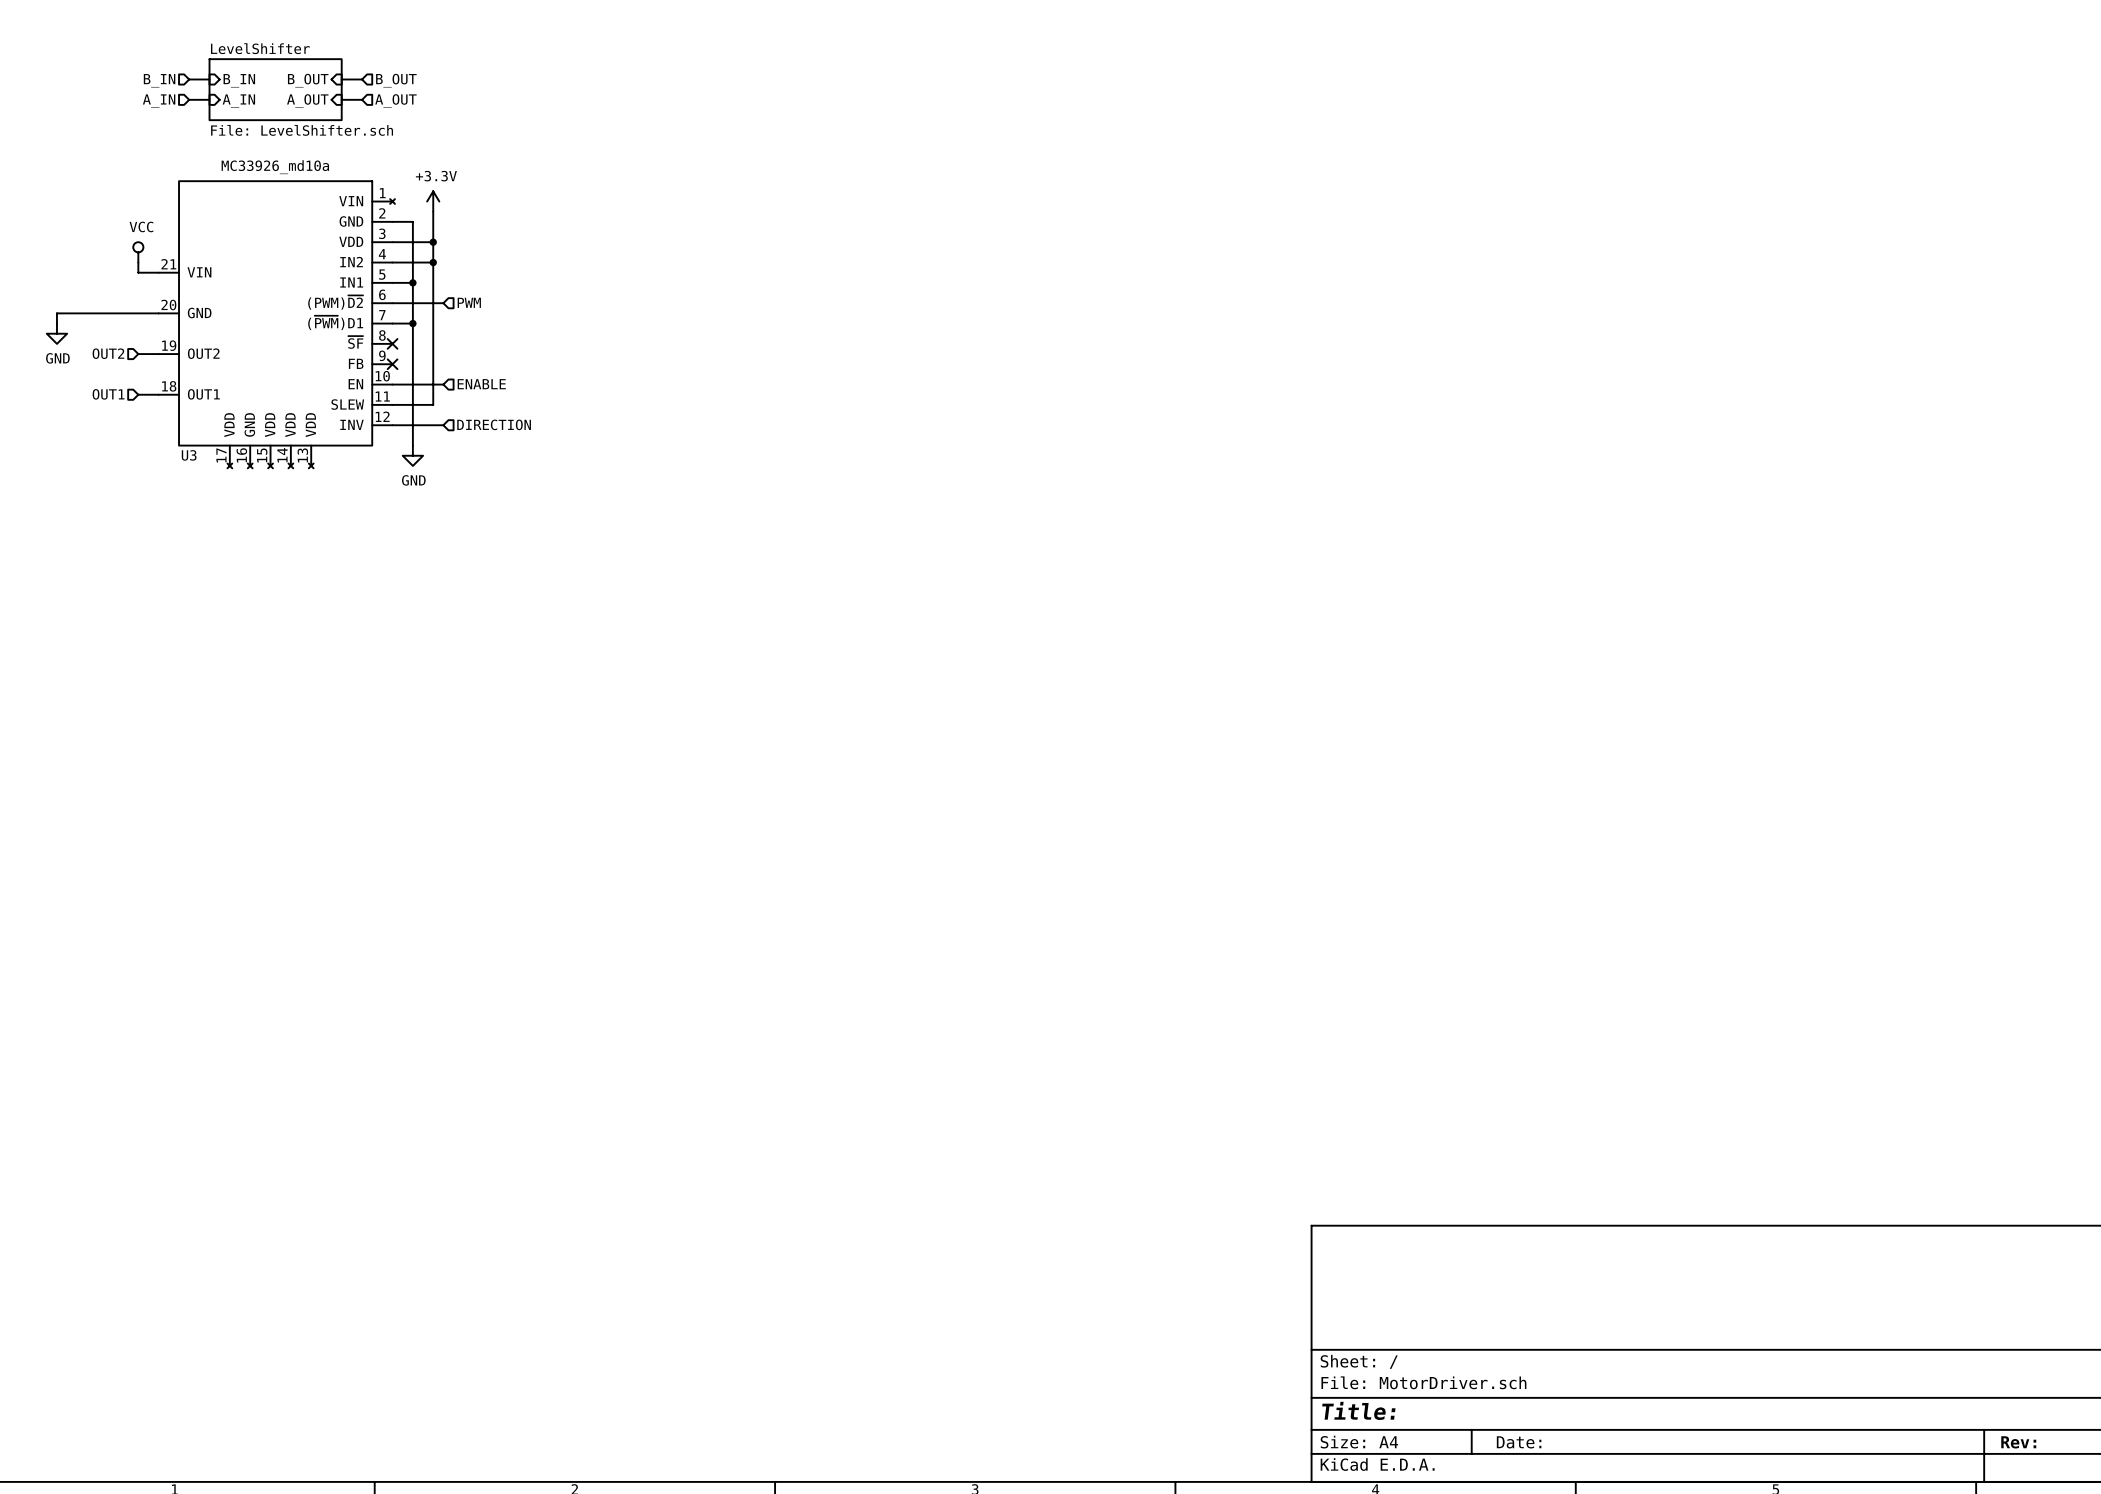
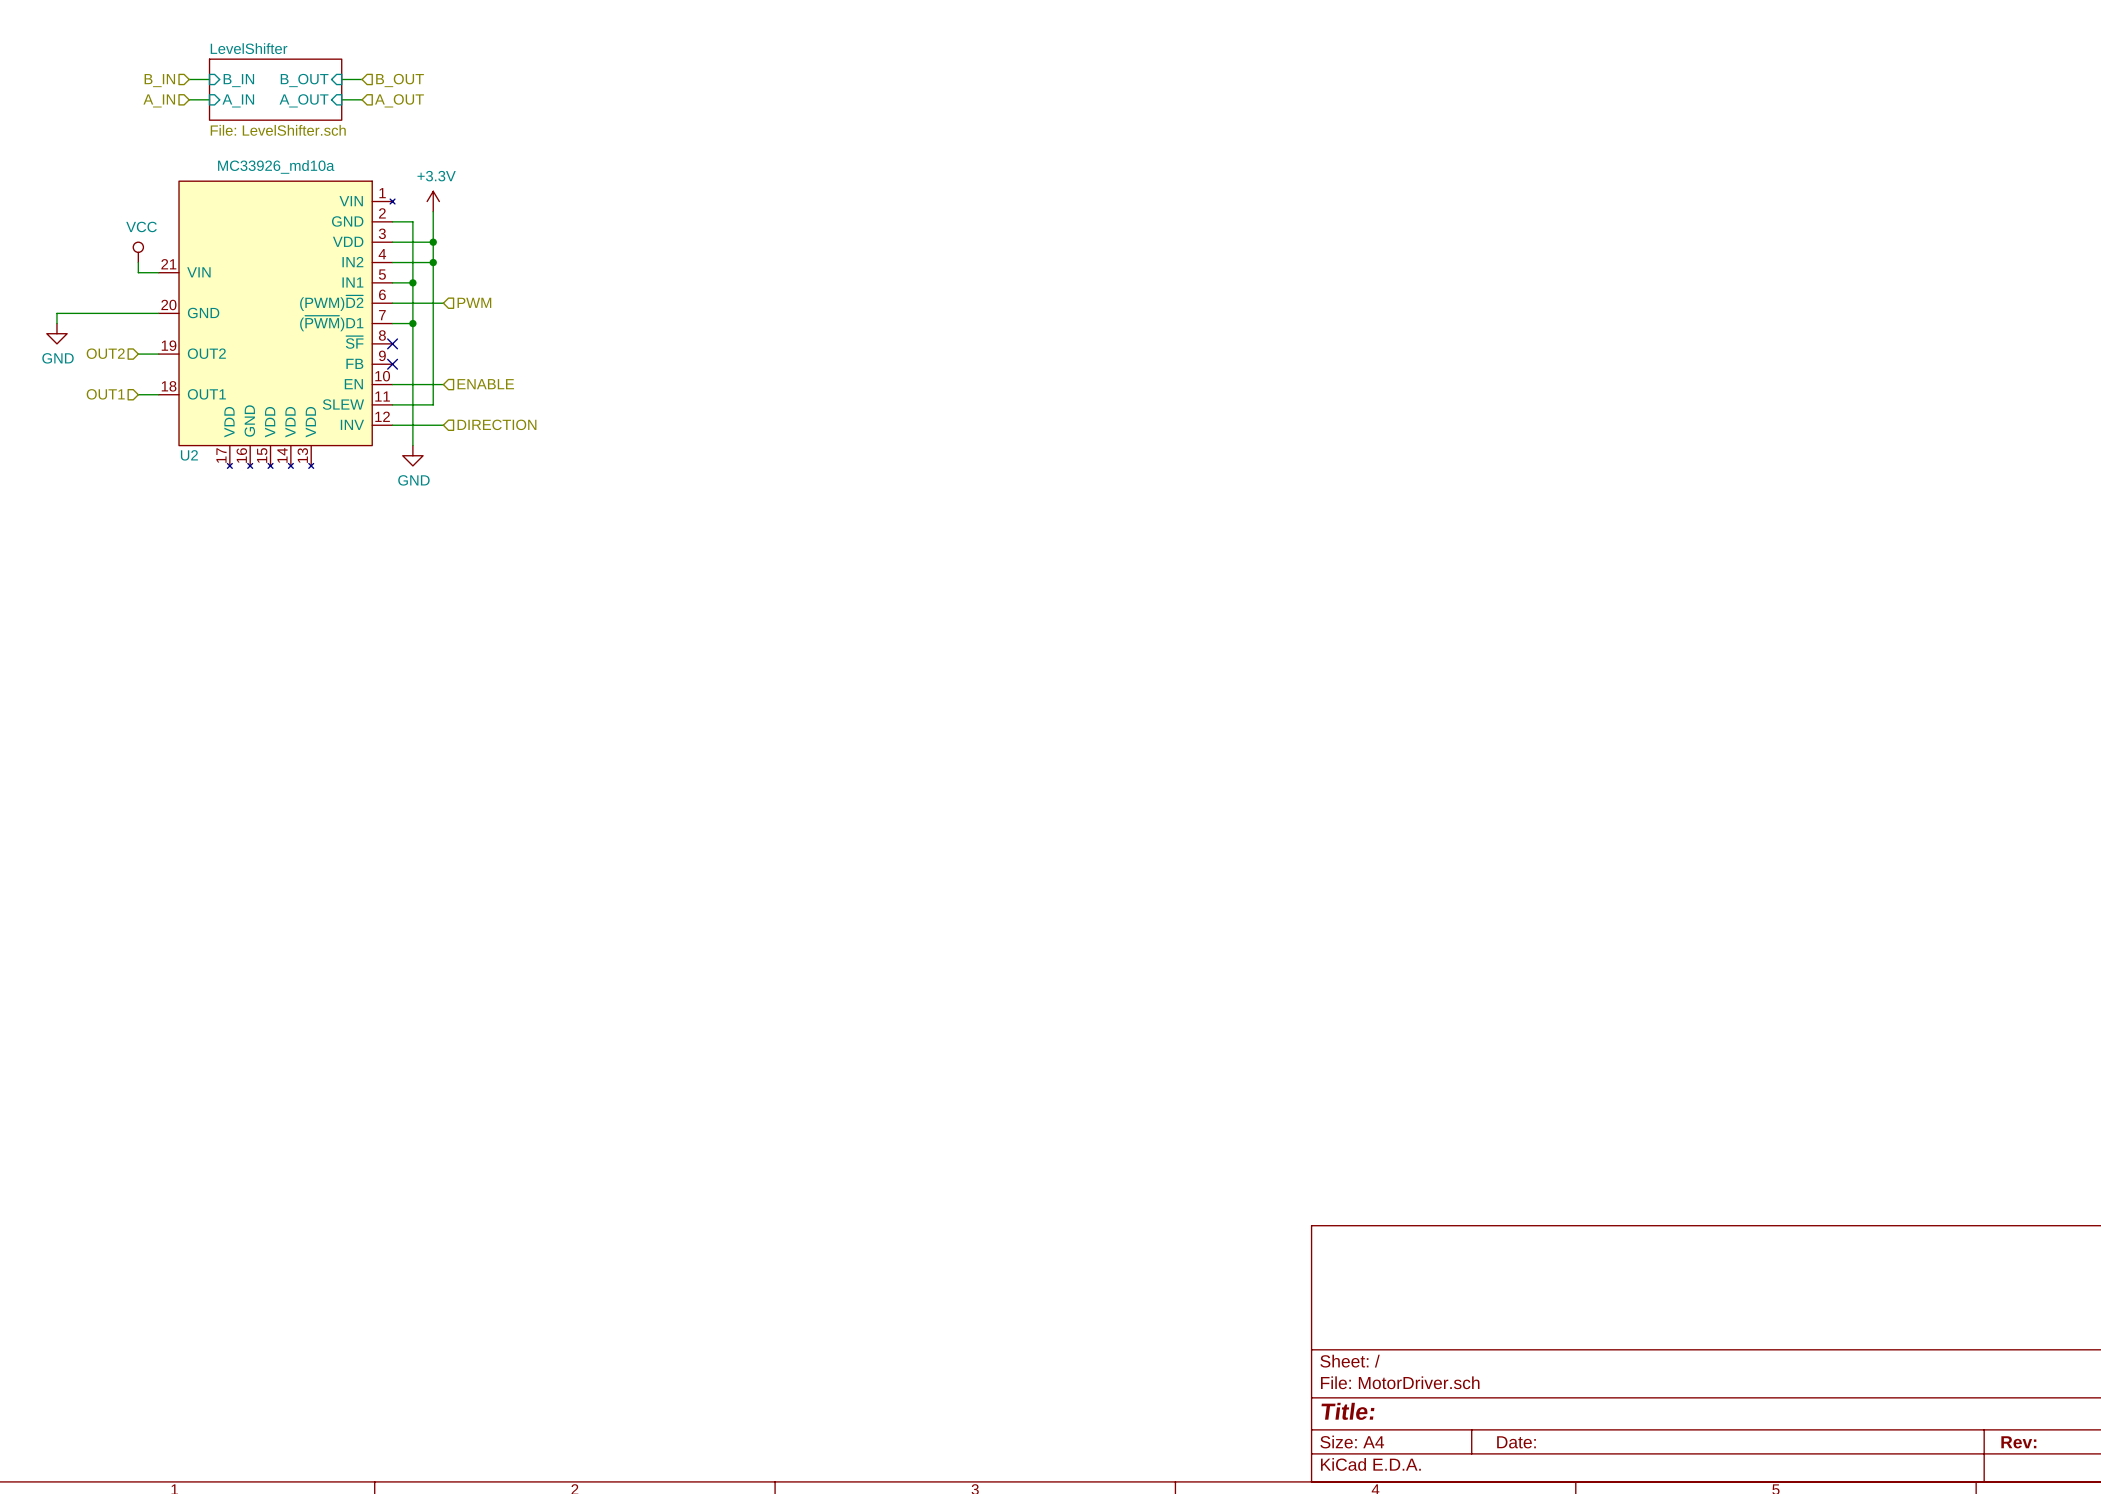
U3 name: U3 (189, 455) -> U2 (189, 455)

